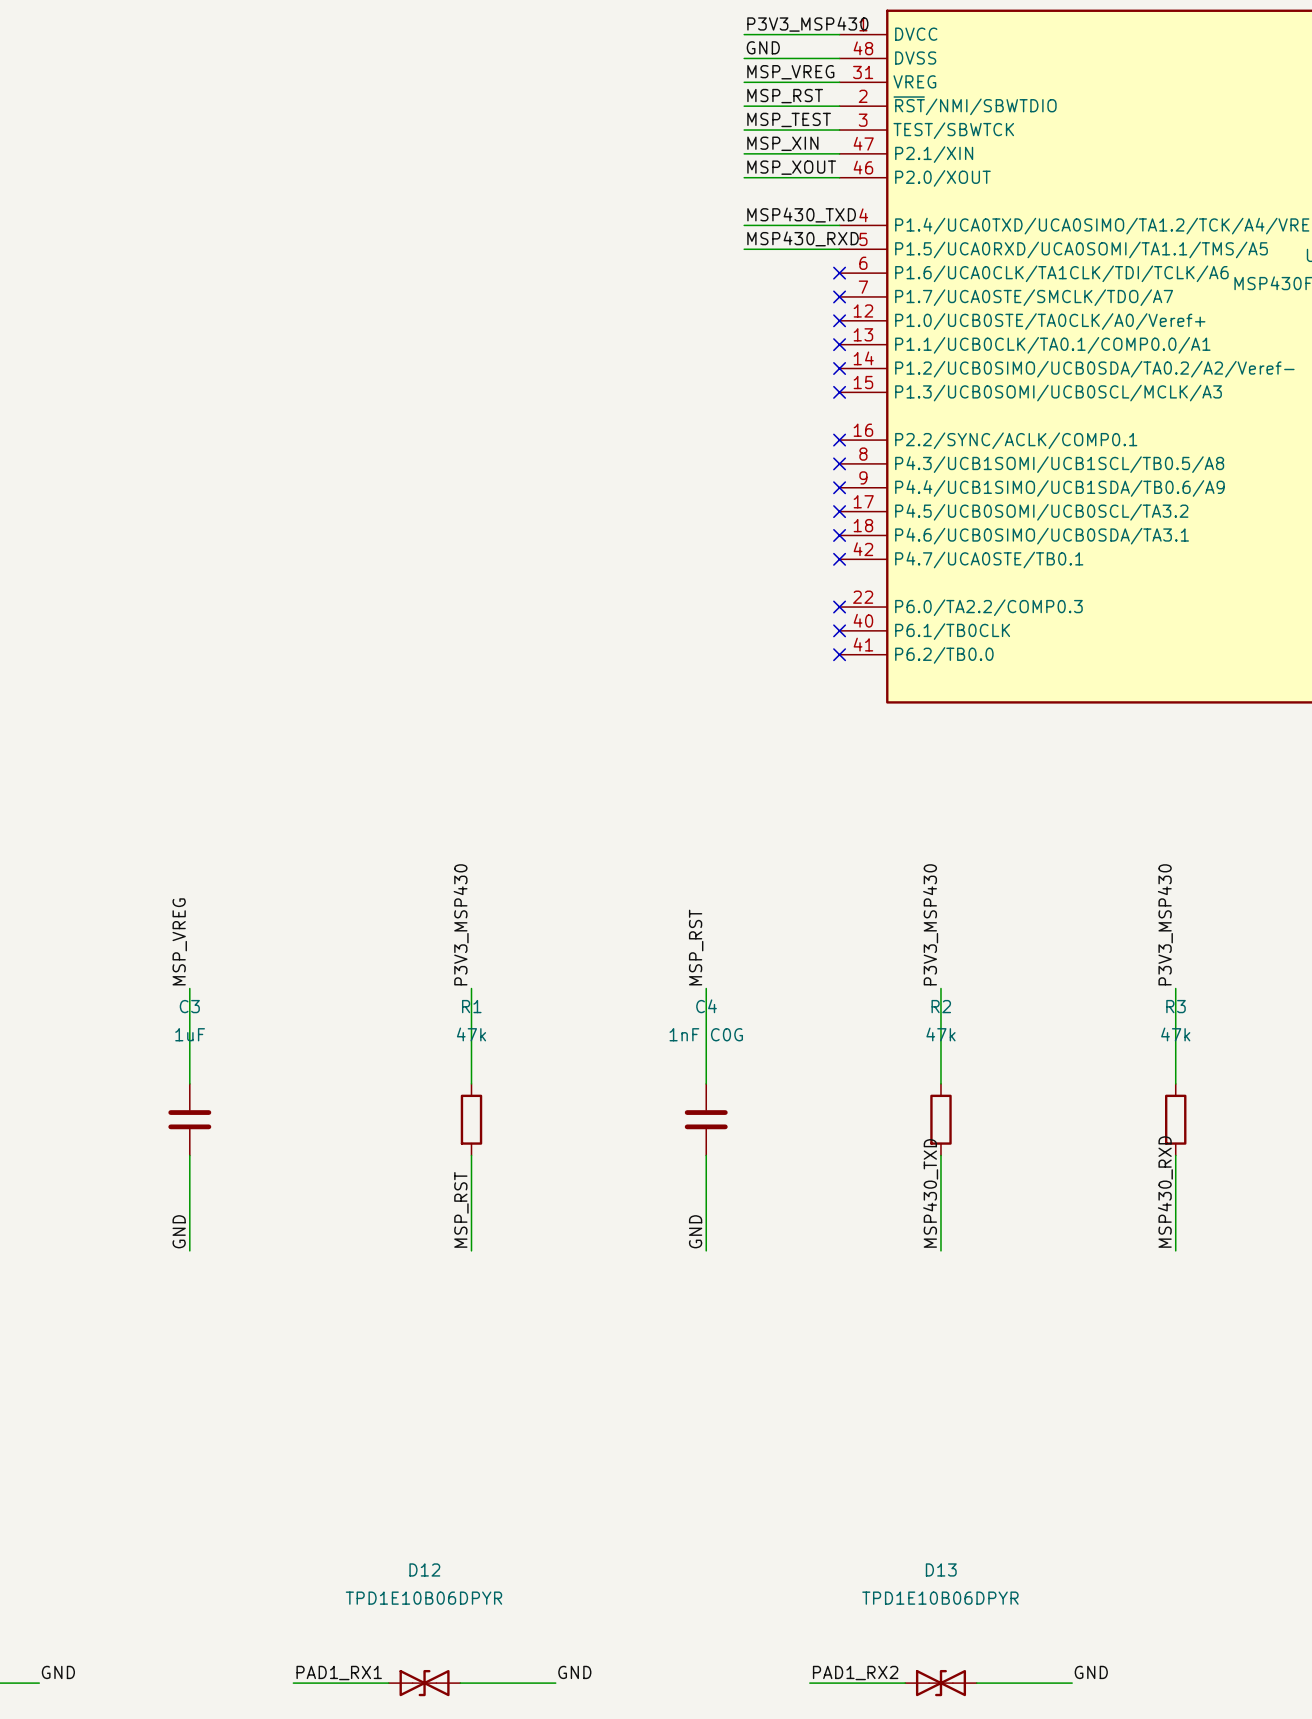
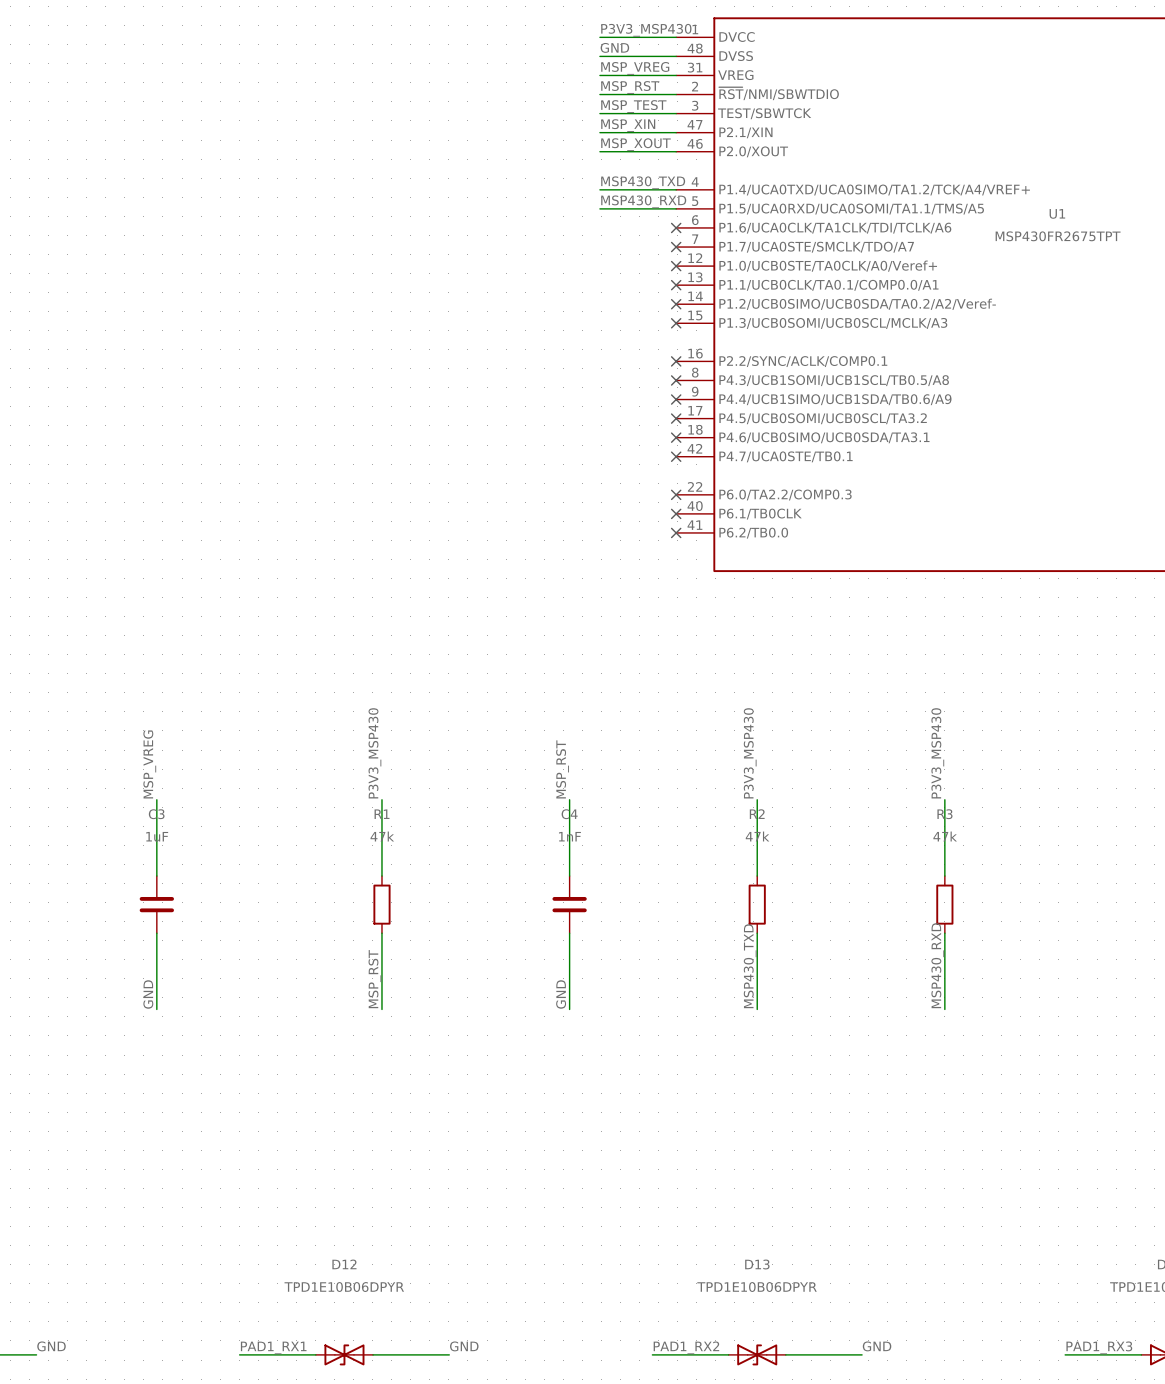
C4 value: 1nF C0G (706, 1034) -> 1nF (569, 836)

